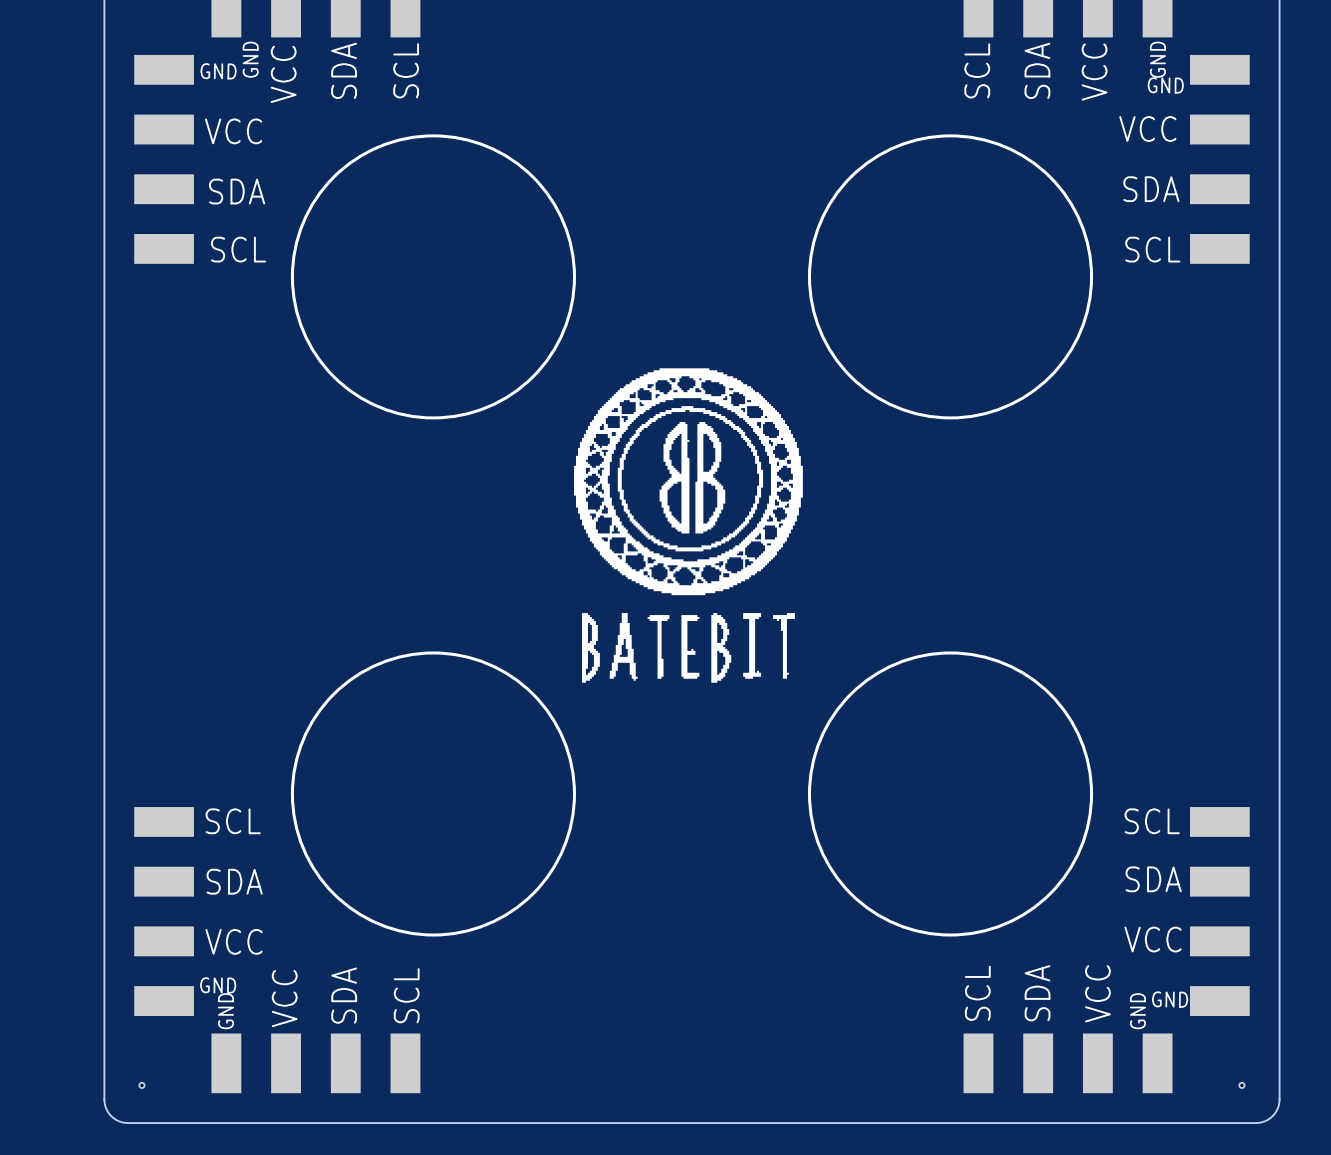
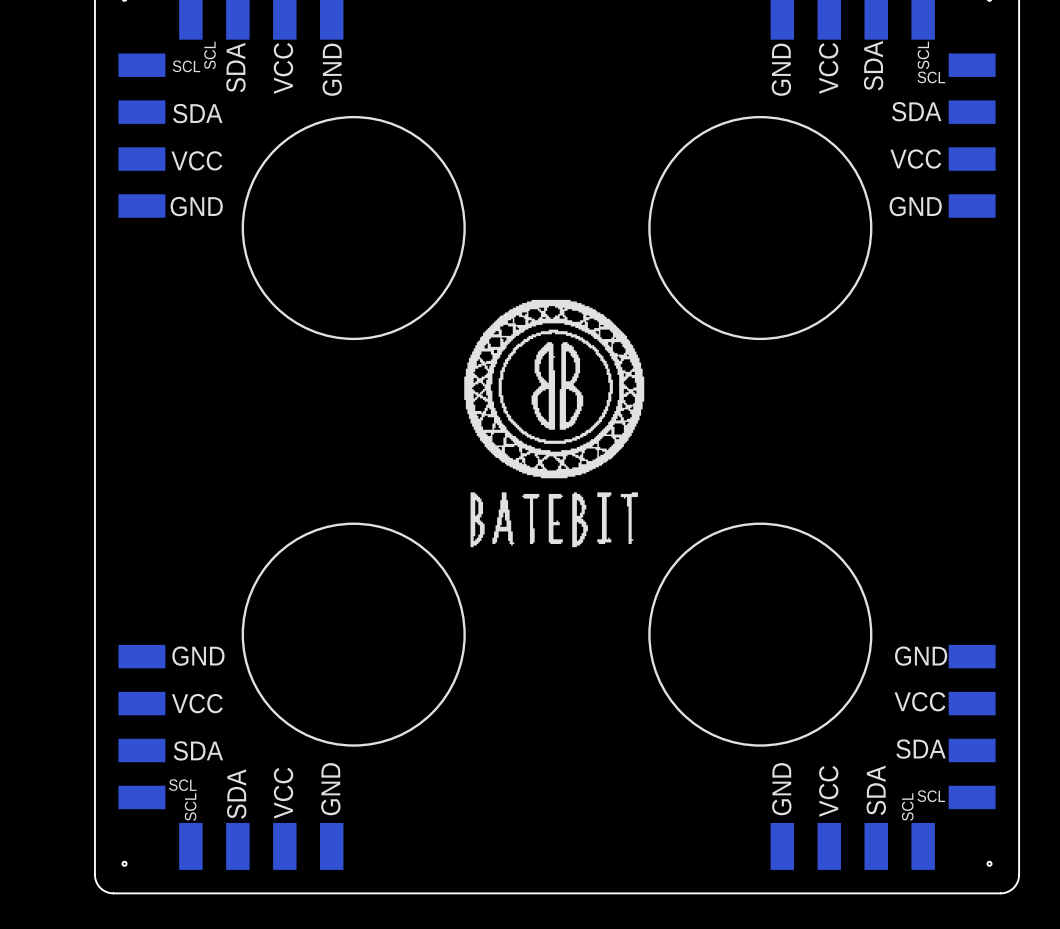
text: GND (250, 59) -> SCL (210, 55)
text: GND (1157, 59) -> SCL (923, 55)
text: SDA (344, 70) -> VCC (283, 68)
text: SCL (406, 70) -> GND (332, 69)
text: SCL (977, 70) -> GND (781, 69)
text: SDA (1037, 70) -> VCC (828, 68)
text: GND (218, 71) -> SCL (186, 66)
text: VCC (1094, 72) -> SDA (873, 65)
text: VCC (283, 74) -> SDA (235, 67)
text: GND (1165, 85) -> SCL (931, 77)
text: VCC (1147, 129) -> SDA (916, 111)
text: VCC (233, 131) -> SDA (197, 113)
text: SDA (1151, 189) -> VCC (915, 159)
text: SDA (237, 191) -> VCC (196, 160)
text: SCL (238, 249) -> GND (196, 206)
text: SCL (1152, 249) -> GND (915, 206)
text: SCL (233, 821) -> GND (198, 656)
text: SCL (1152, 821) -> GND (921, 656)
text: SDA (1153, 879) -> VCC (920, 701)
text: SDA (234, 881) -> VCC (197, 703)
text: VCC (1153, 939) -> SDA (921, 749)
text: VCC (234, 941) -> SDA (198, 750)
text: GND (218, 985) -> SCL (182, 785)
text: SCL (977, 993) -> GND (781, 789)
text: SDA (1037, 993) -> VCC (828, 791)
text: VCC (1097, 993) -> SDA (876, 790)
text: SDA (344, 995) -> VCC (283, 793)
text: SCL (406, 995) -> GND (330, 789)
text: VCC (284, 998) -> SDA (236, 794)
text: GND (1170, 999) -> SCL (931, 796)
text: GND (226, 1011) -> SCL (190, 807)
text: GND (1137, 1011) -> SCL (907, 807)

